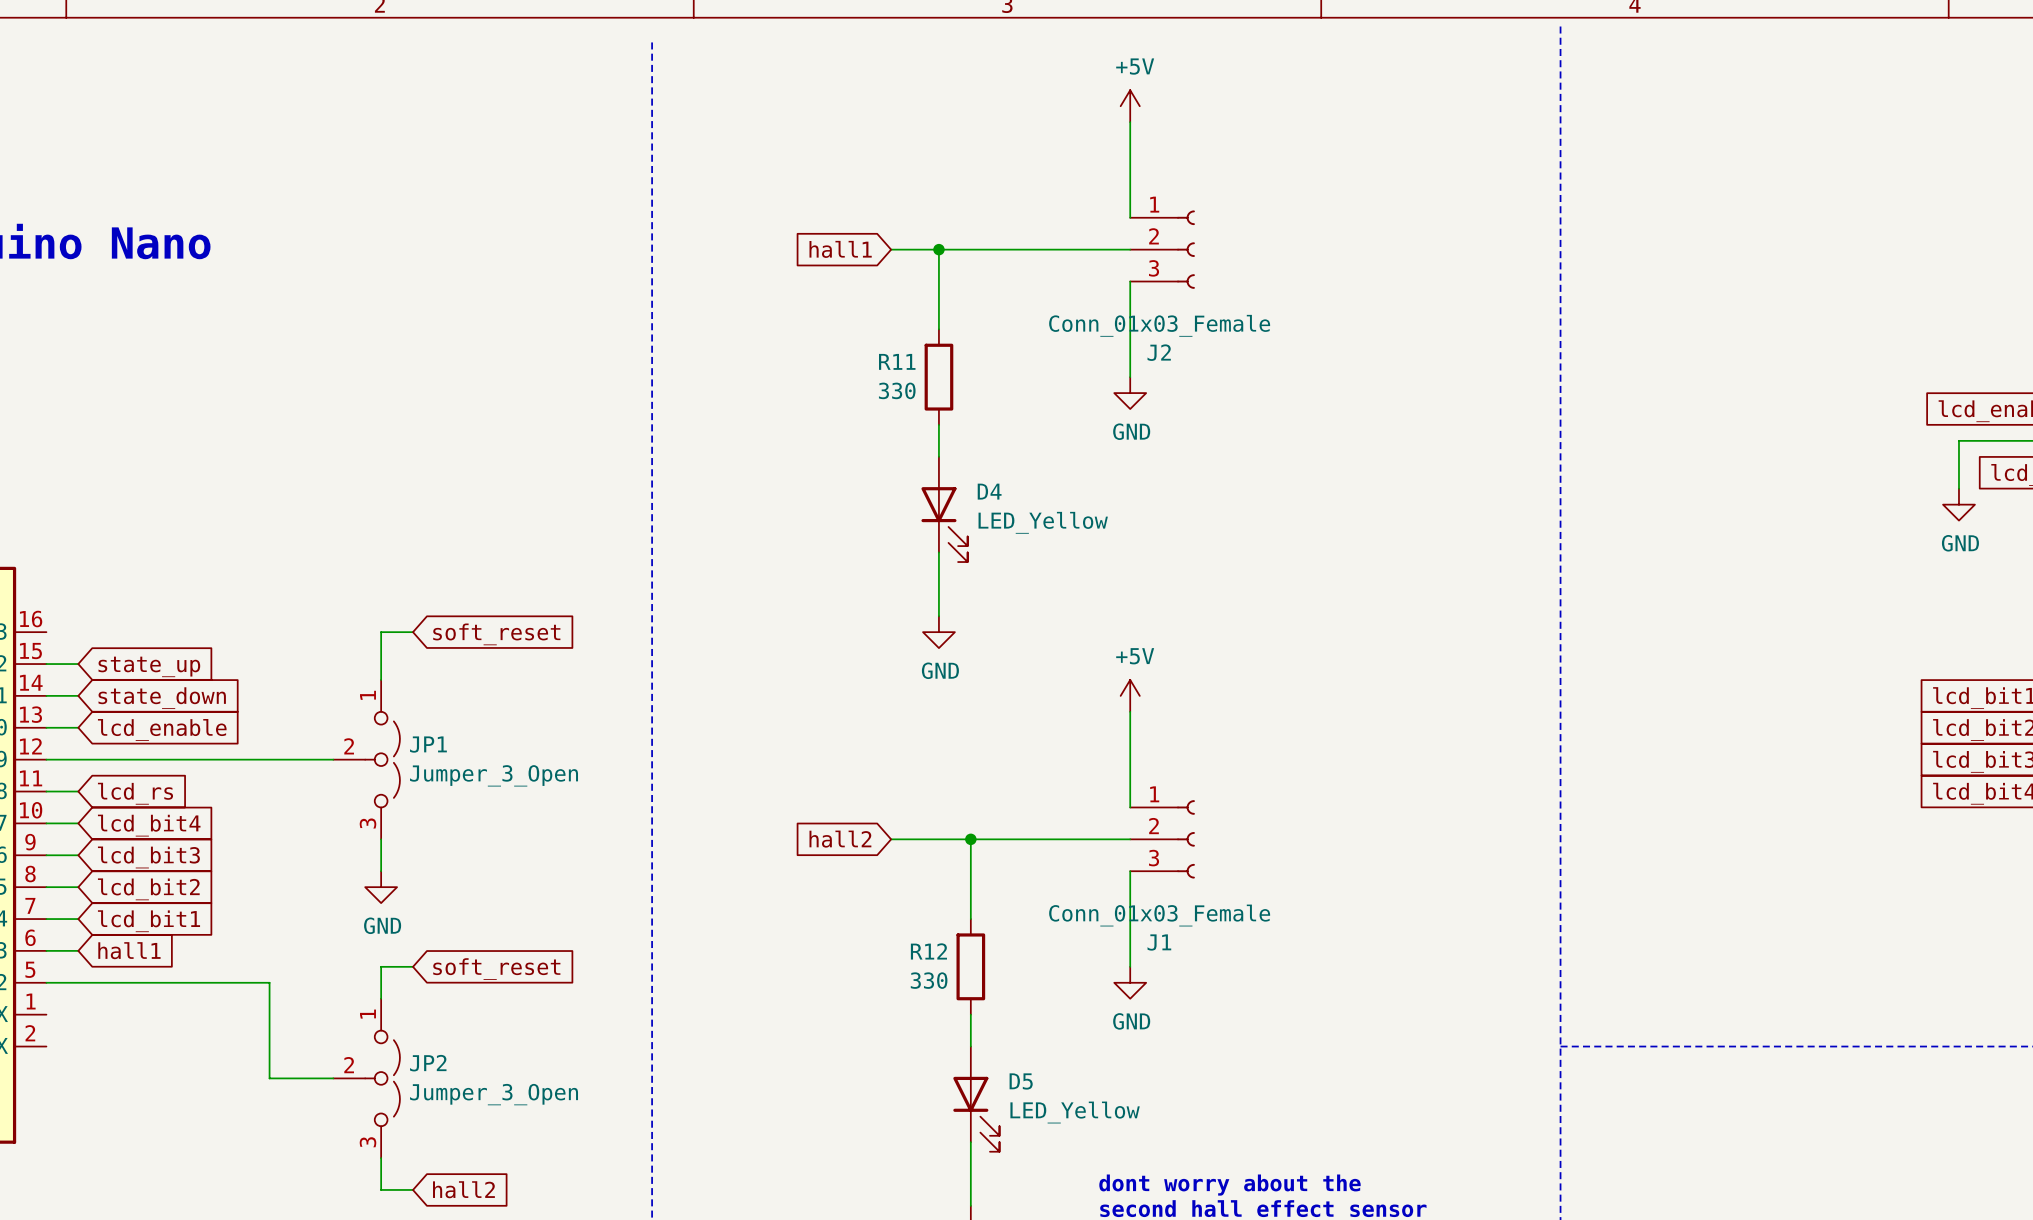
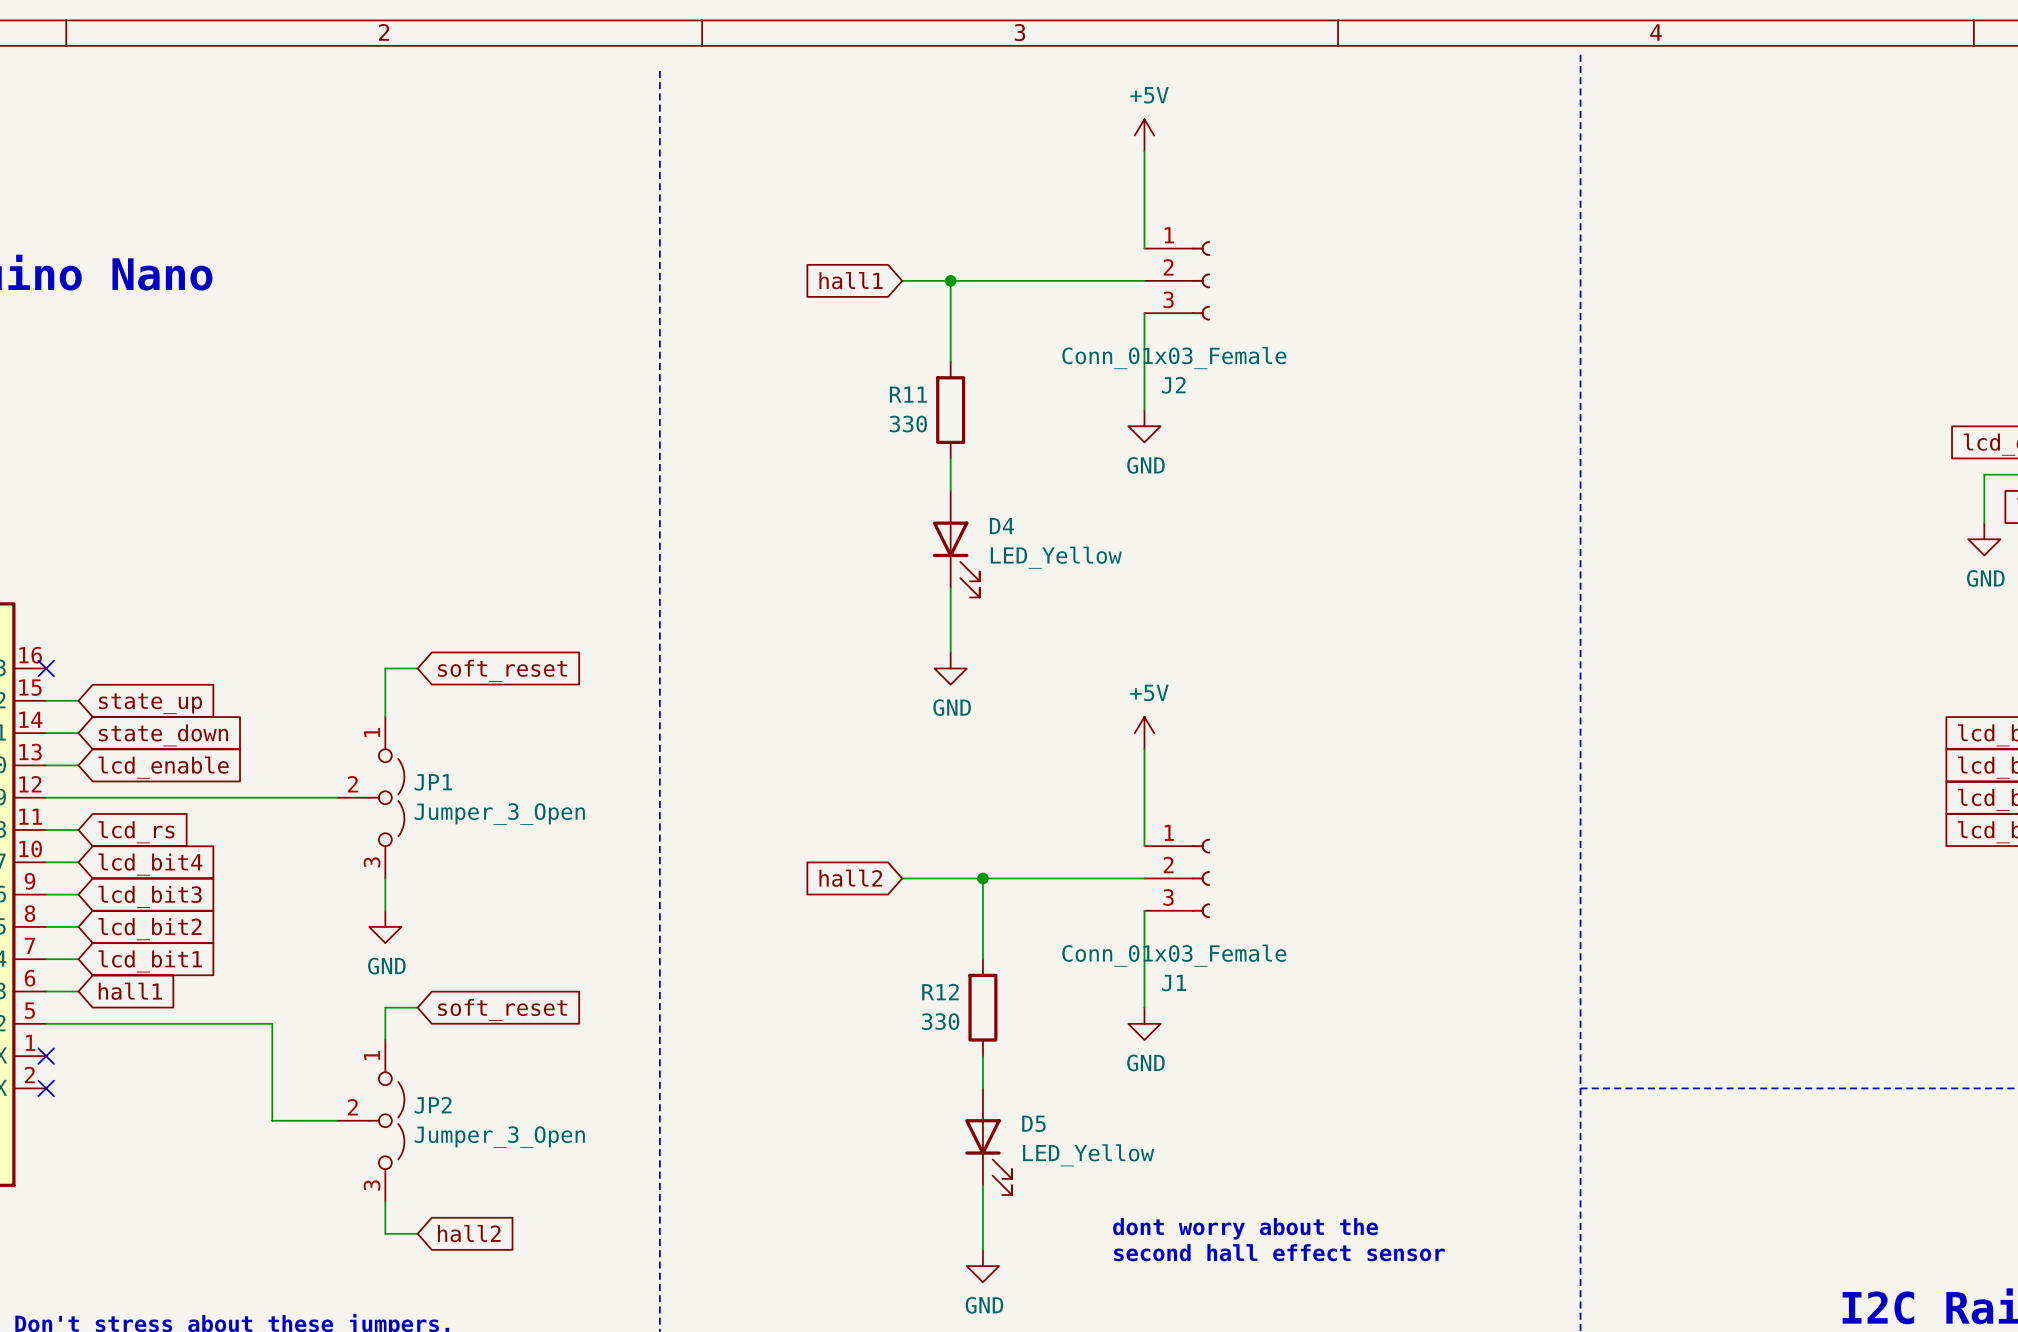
no-connect mark: none -> (46, 668)
no-connect mark: none -> (46, 1056)
no-connect mark: none -> (46, 1088)

